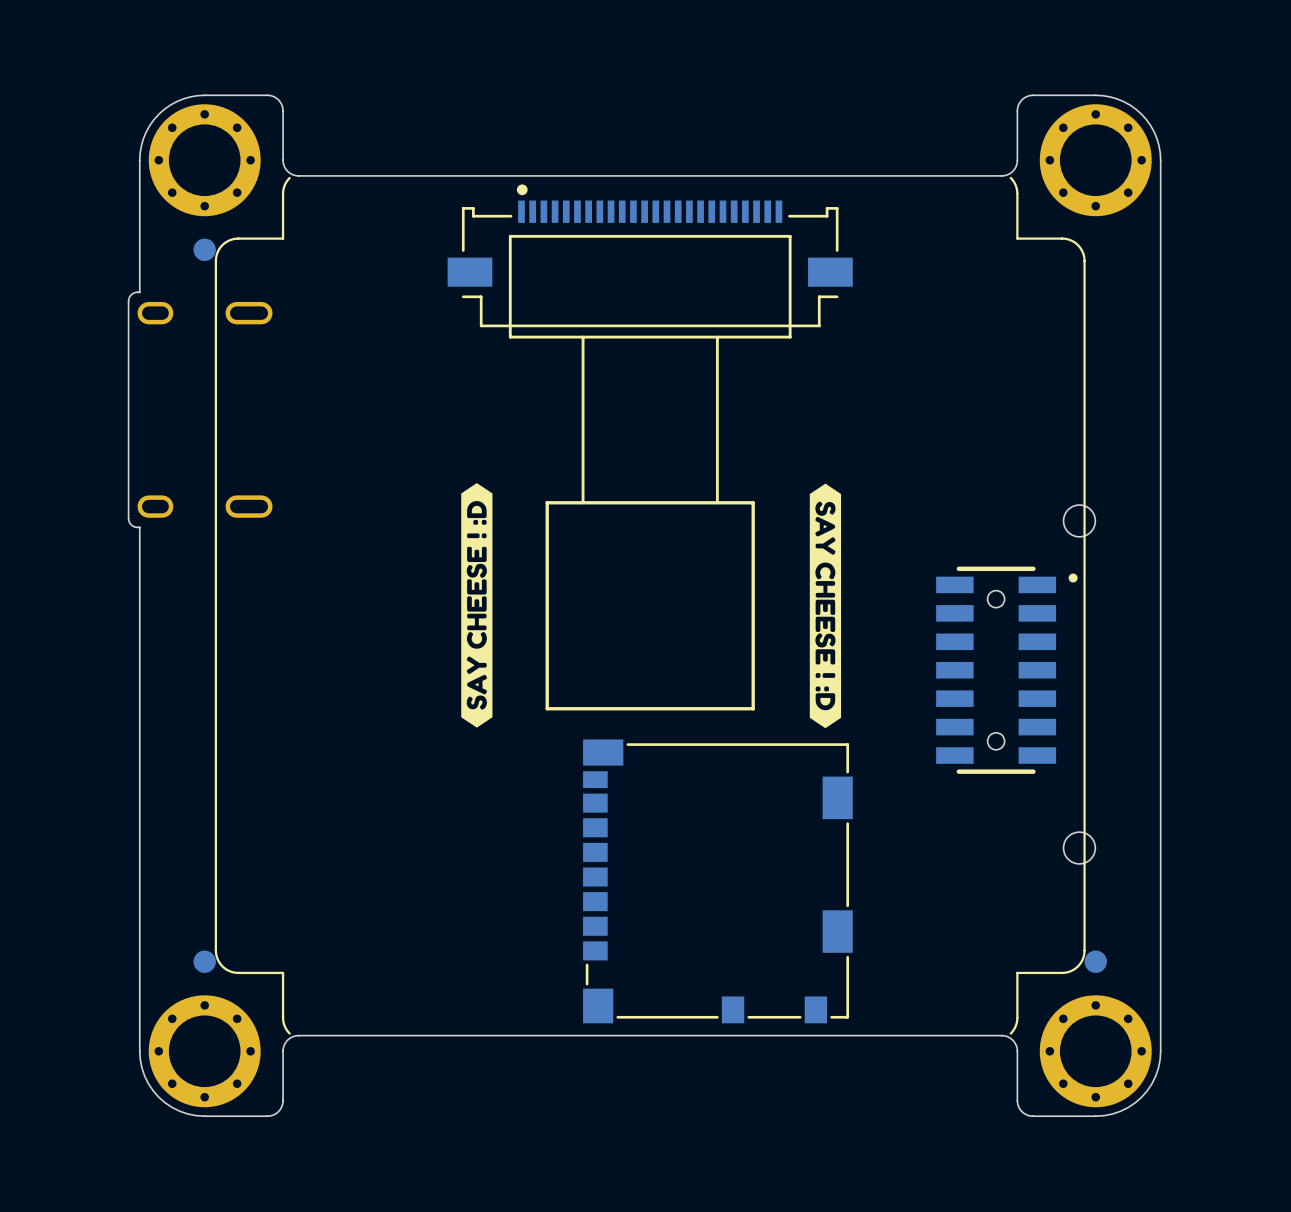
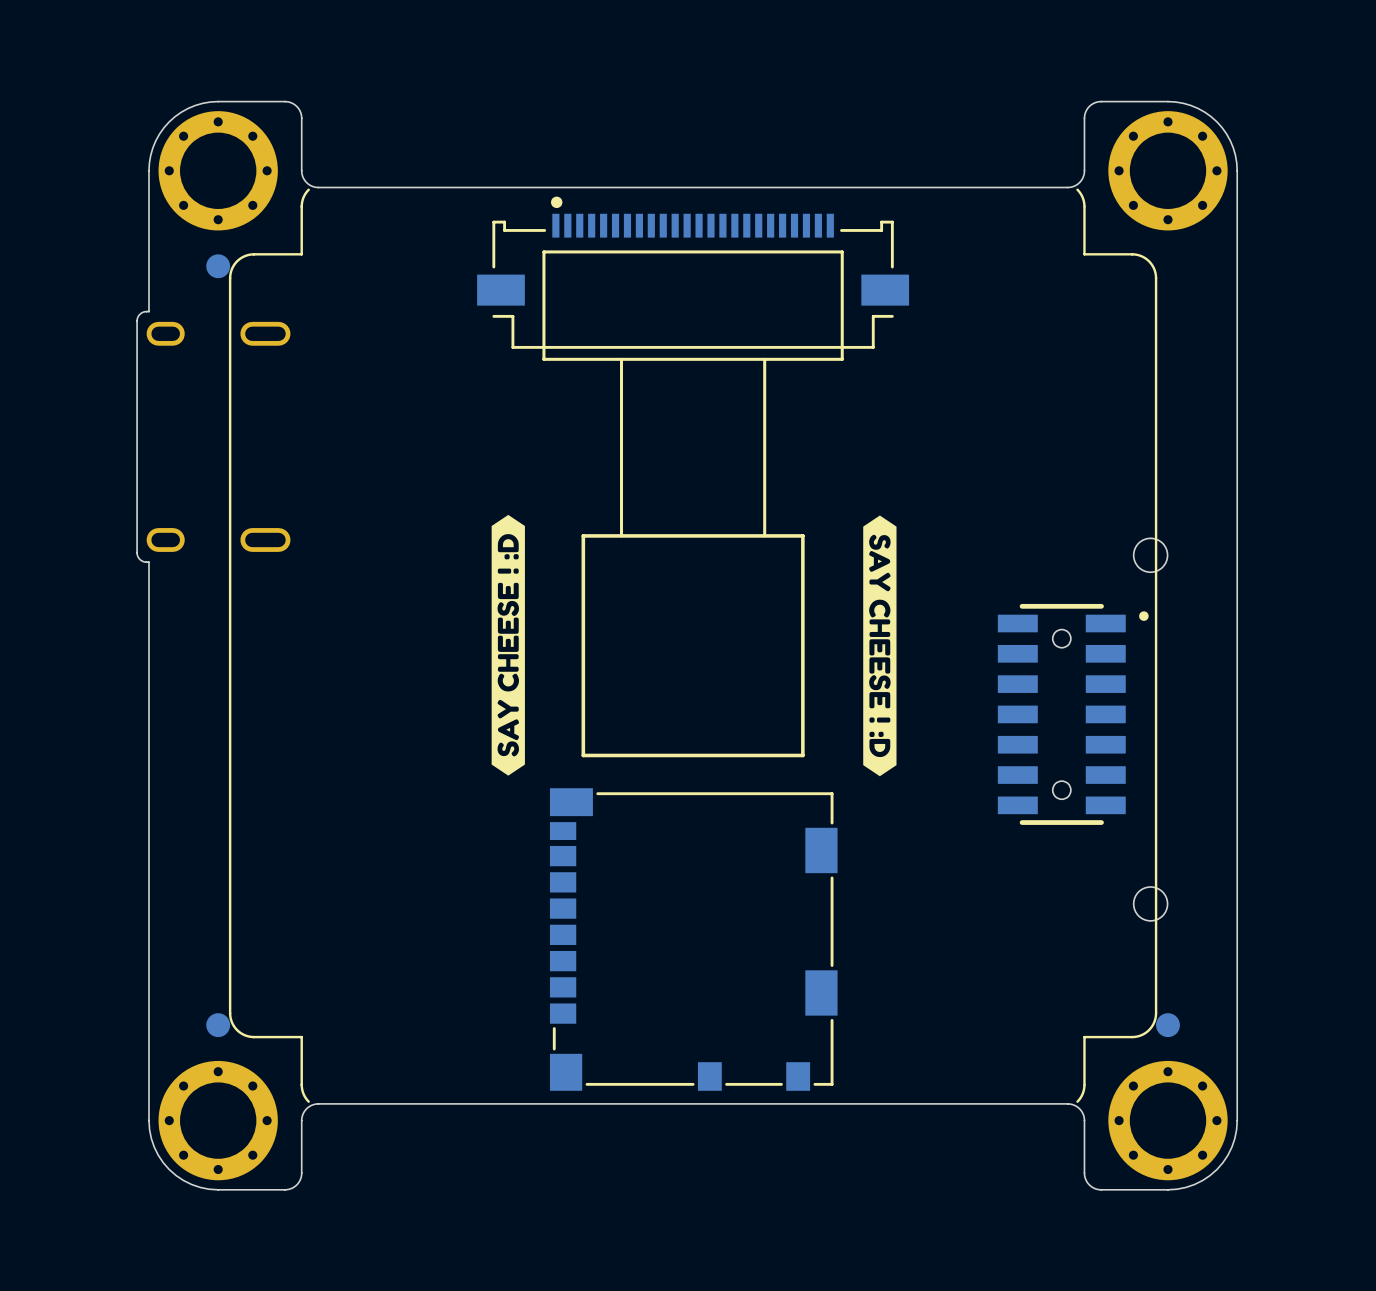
part position: (717, 881) -> (693, 939)

